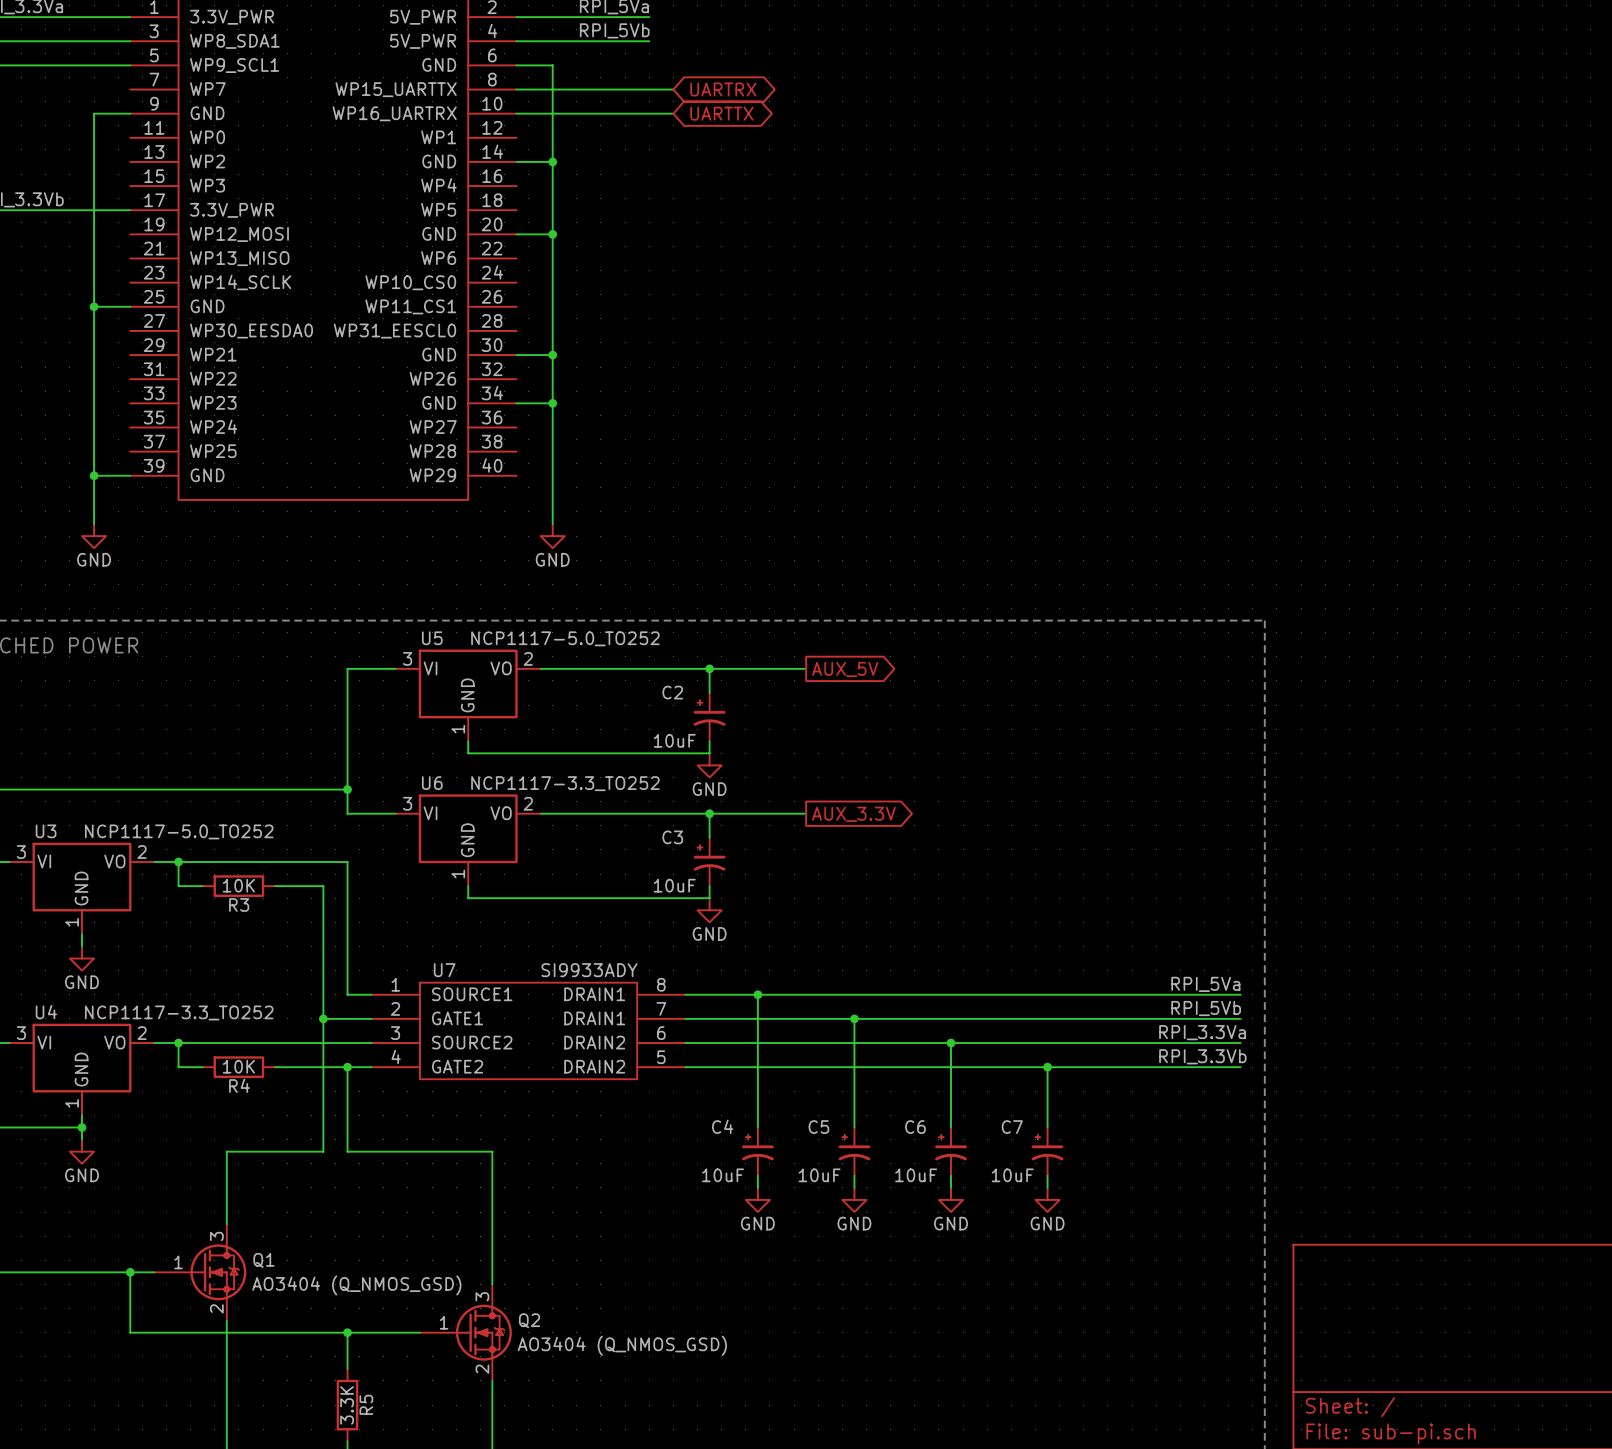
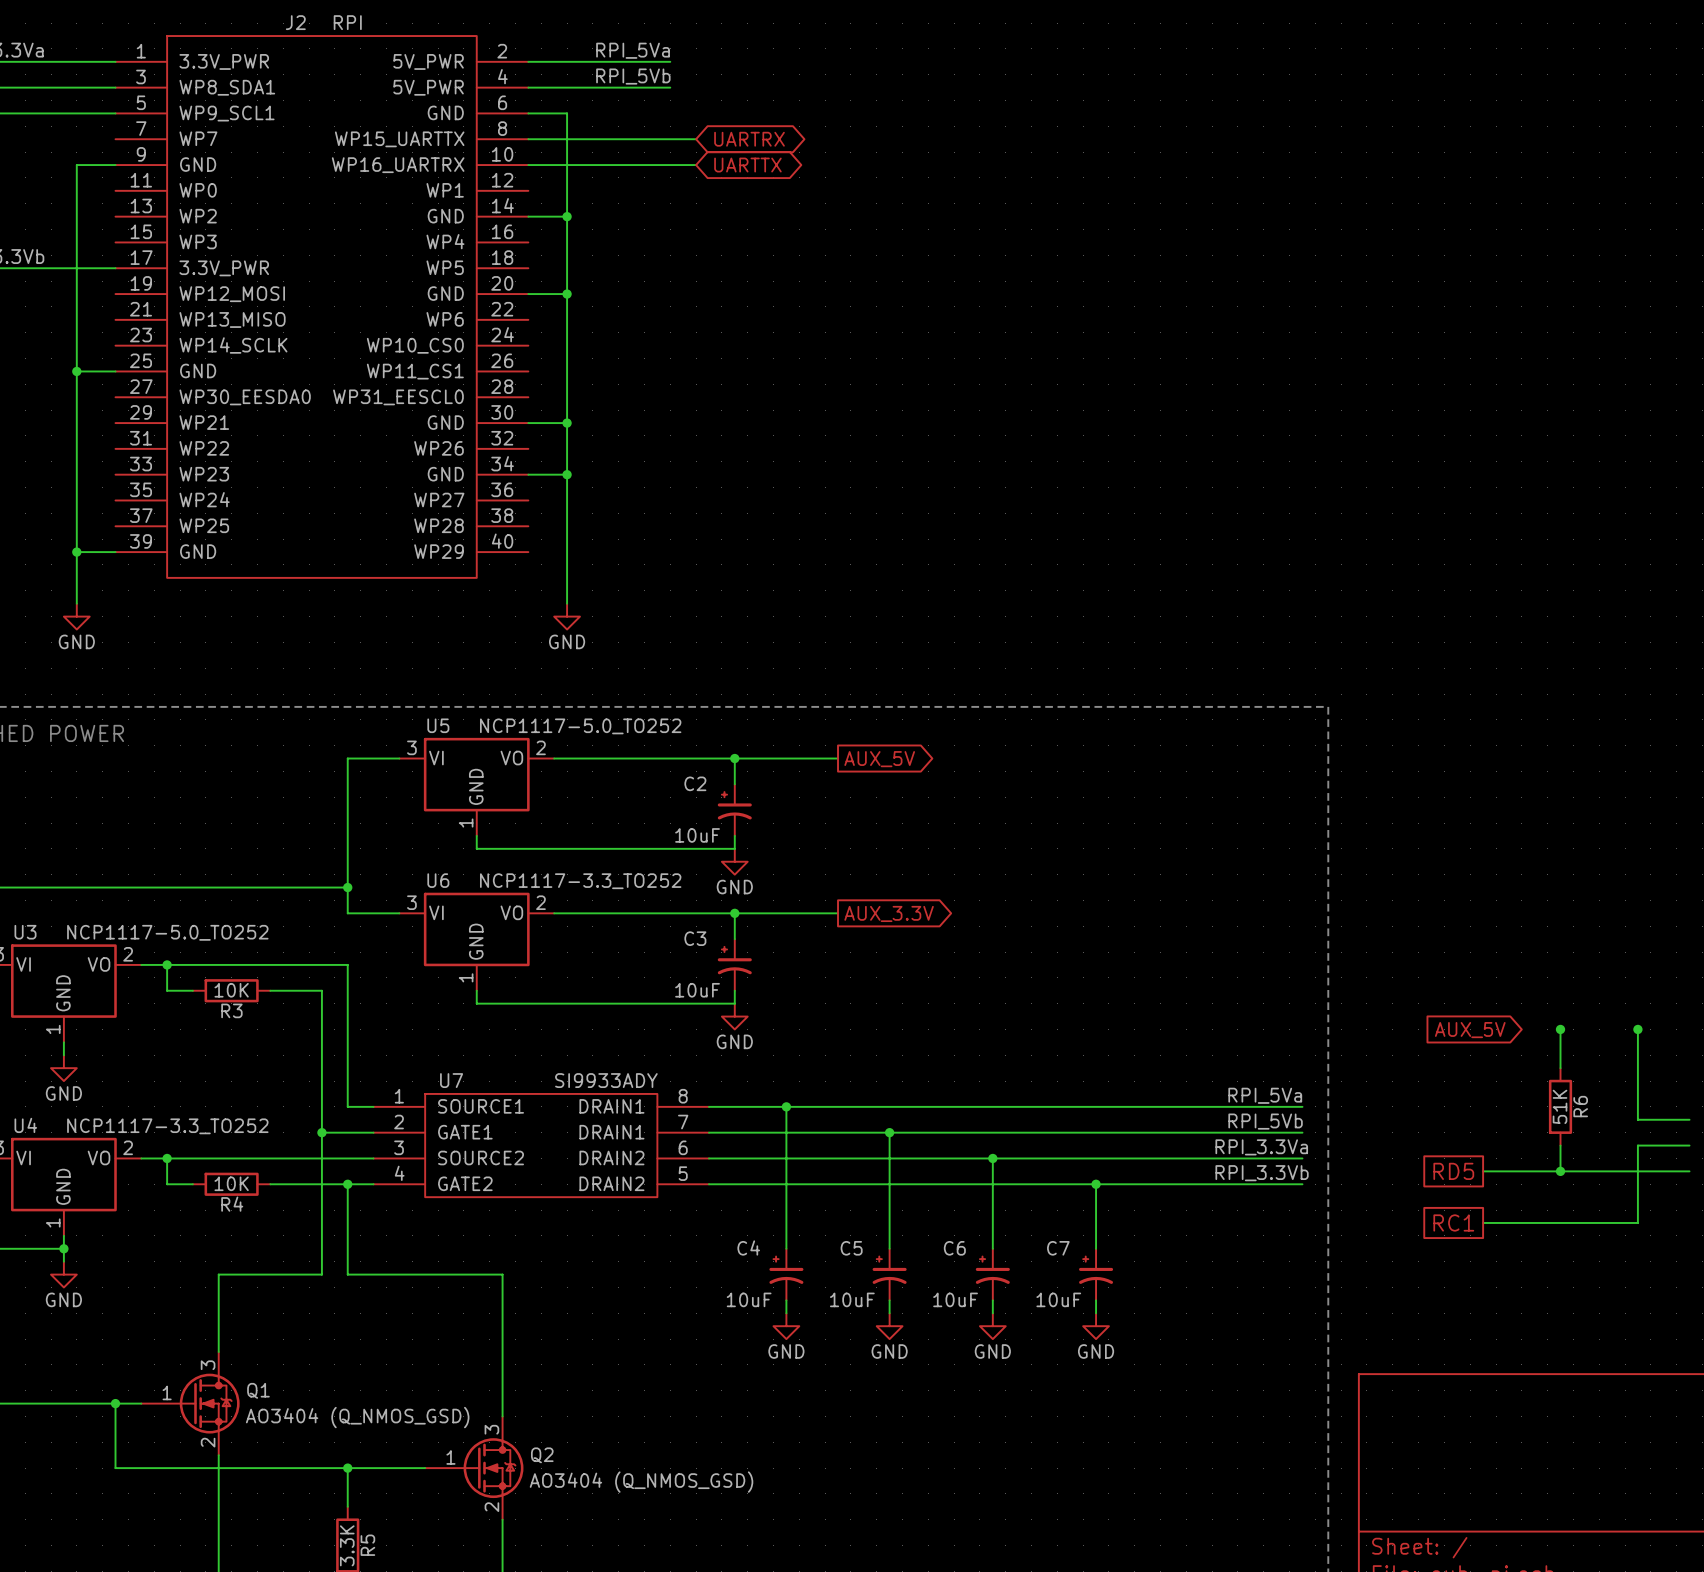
global label: none -> AUX_5V (1470, 1030)
wire: none -> (1560, 1029) (1560, 1068)
junction: none -> (1560, 1029)
wire: none -> (1637, 1029) (1637, 1119) (1689, 1119)
junction: none -> (1637, 1029)
R6: none -> 51K (1560, 1106)
wire: none -> (1560, 1145) (1560, 1171)
wire: none -> (1689, 1145) (1637, 1145) (1637, 1222) (1483, 1222)
global label: none -> RD5 (1453, 1171)
wire: none -> (1483, 1171) (1689, 1171)
junction: none -> (1560, 1171)
global label: none -> RC1 (1453, 1222)

